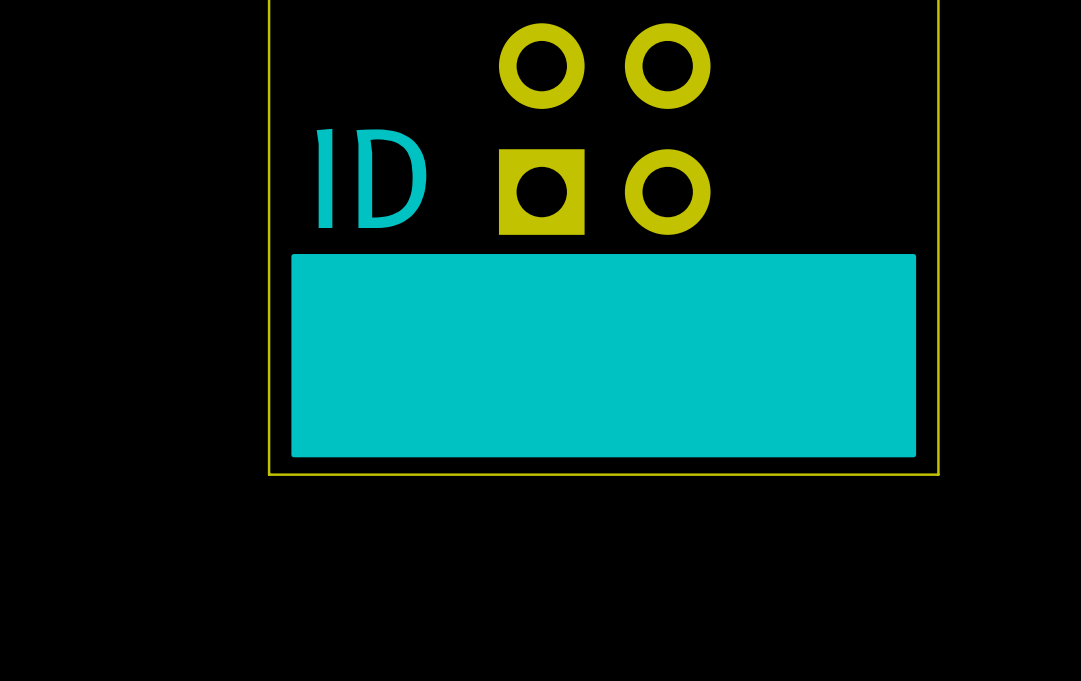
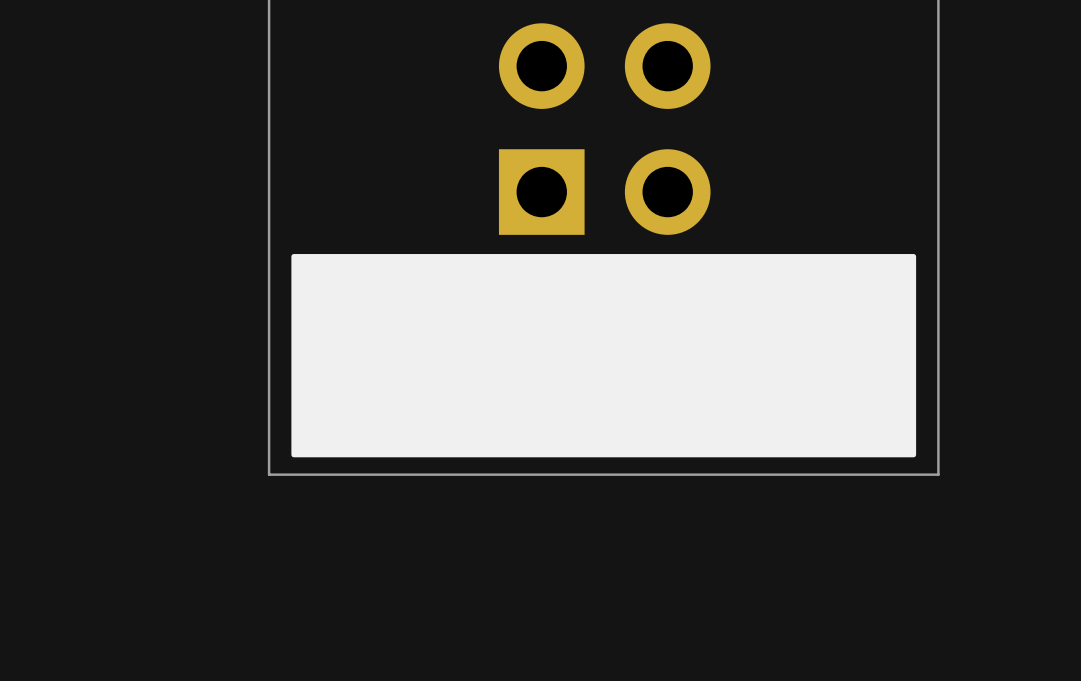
text: ID (371, 178) -> none

